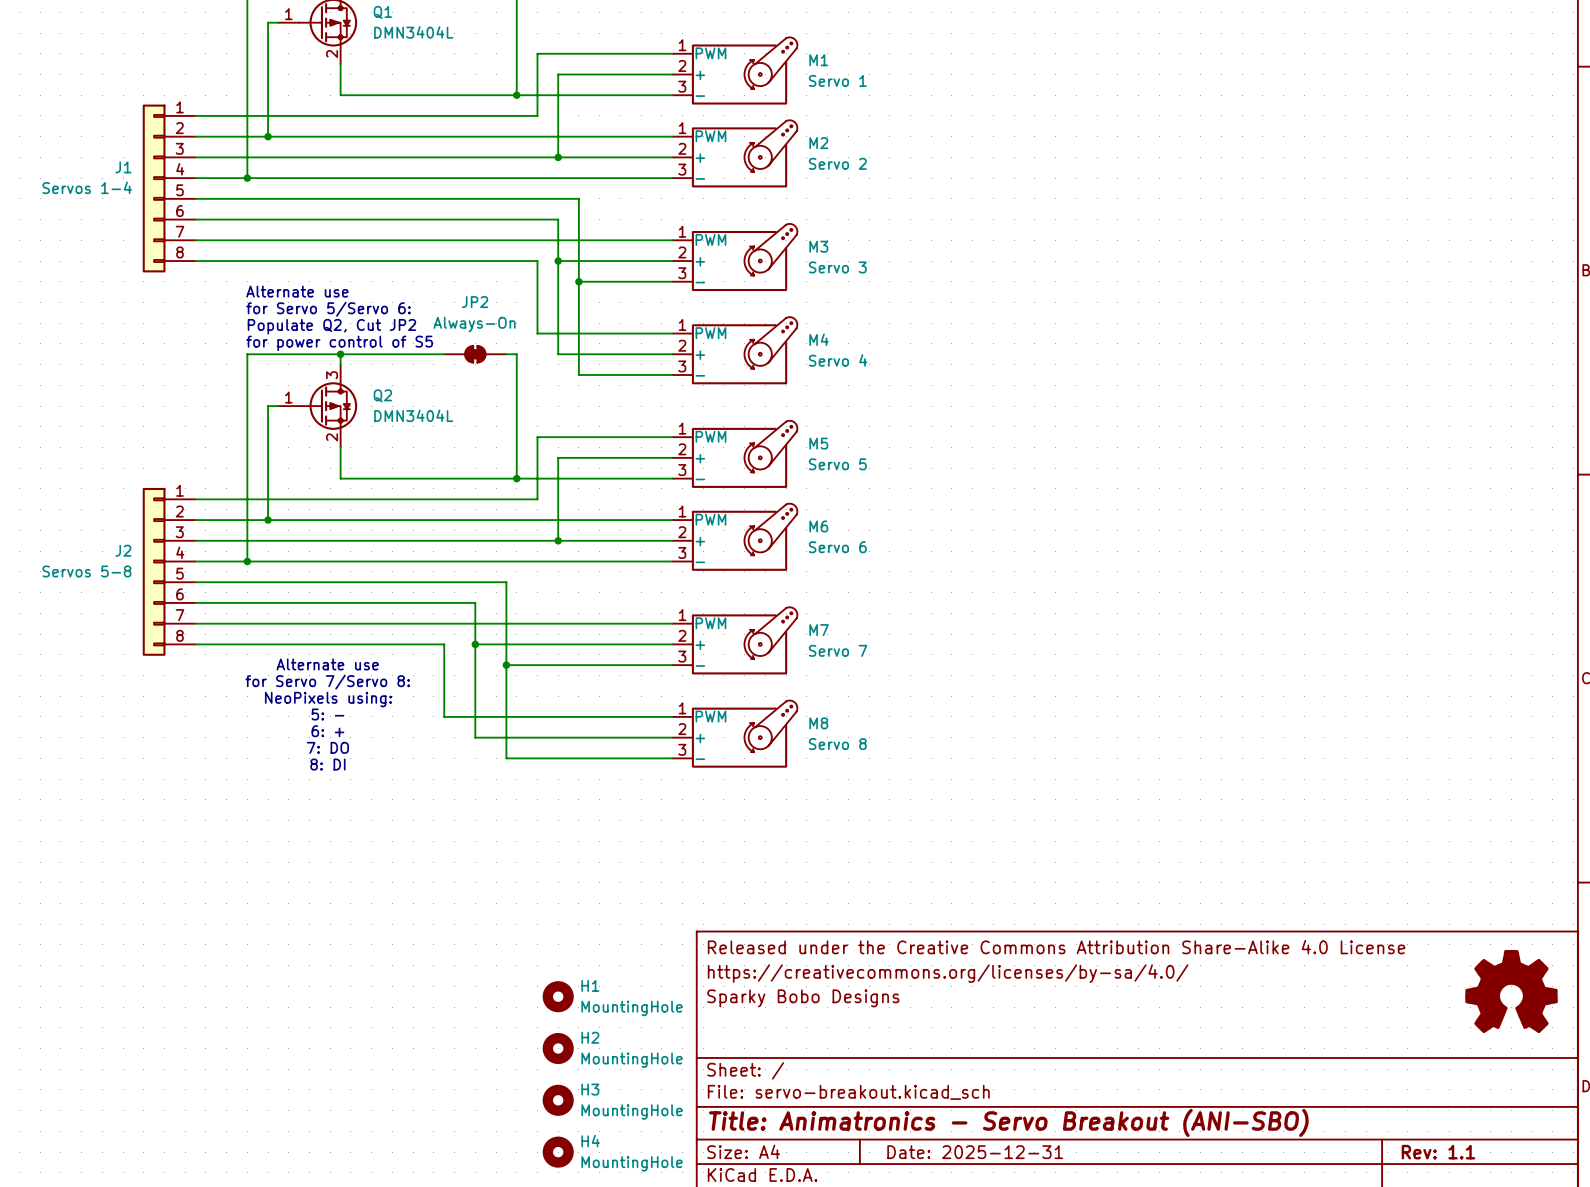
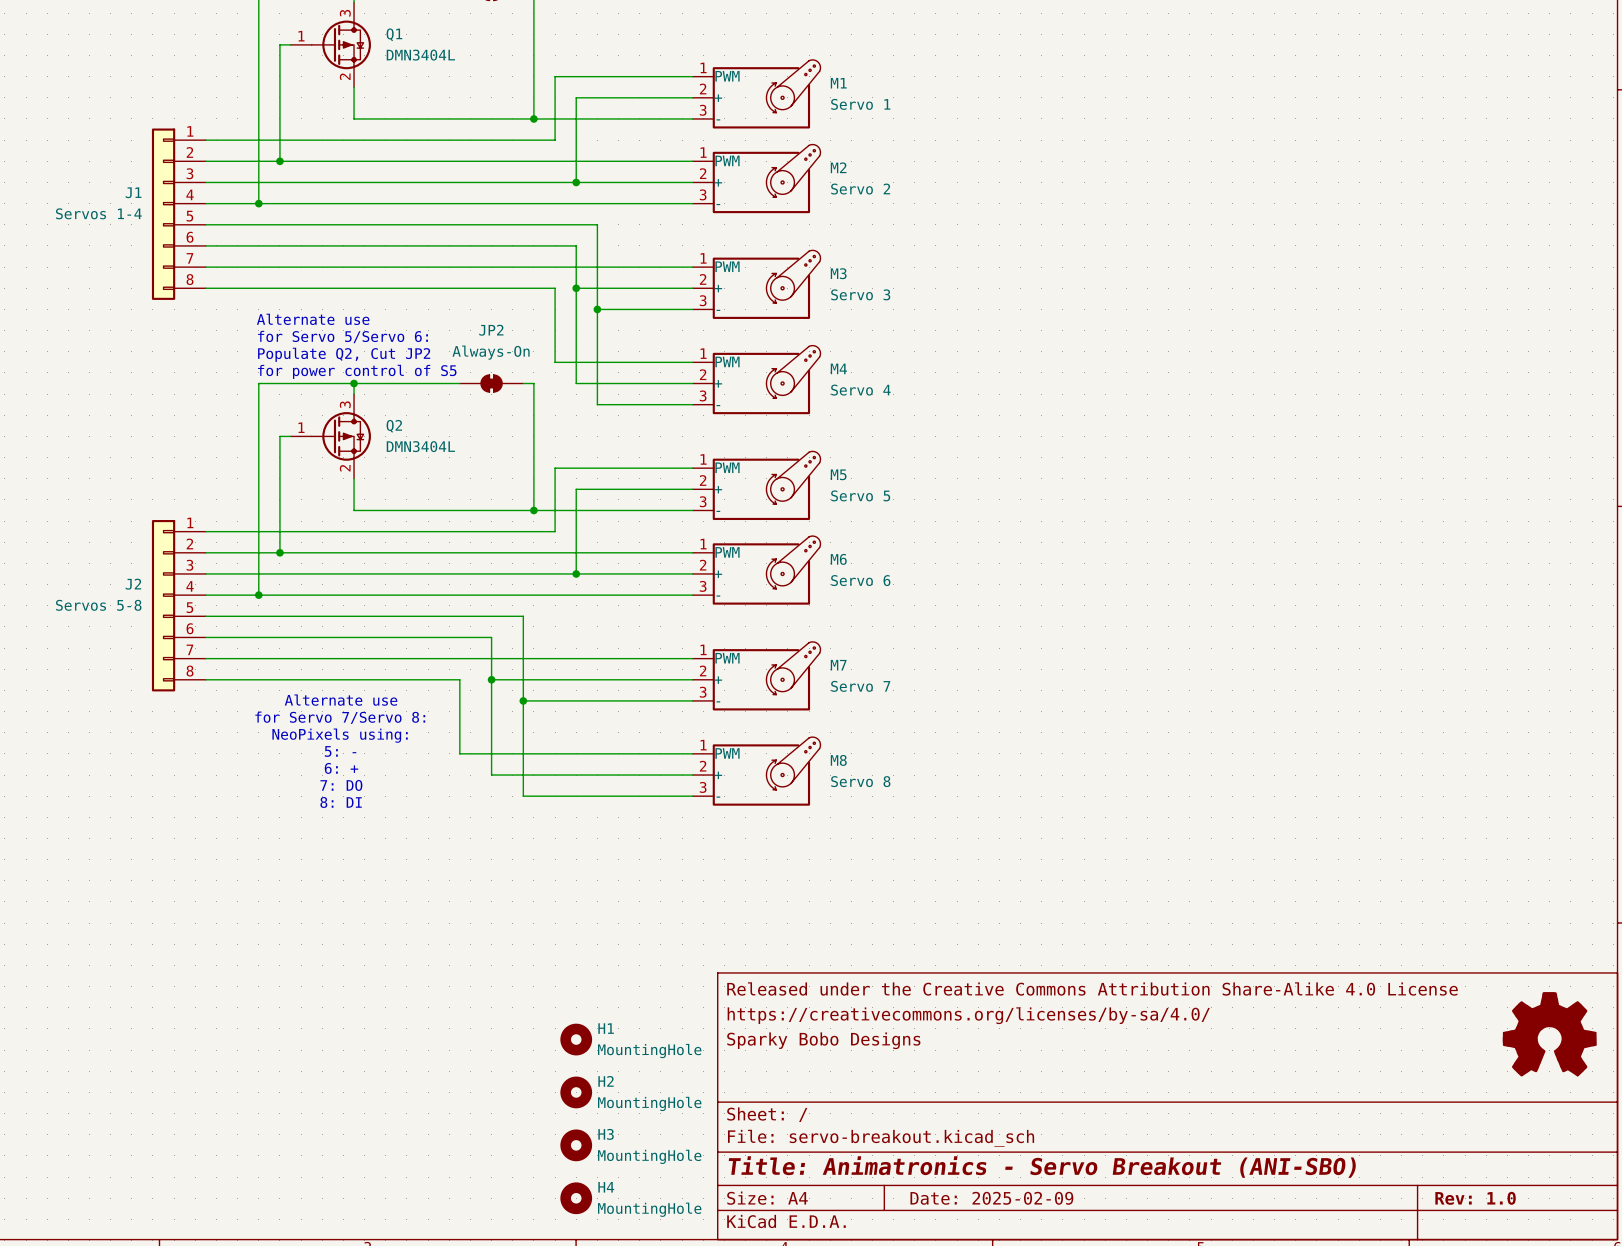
title block: Date: 2025-12-31 (975, 1152) -> Date: 2025-02-09 (991, 1198)
title block: Rev: 1.1 (1438, 1152) -> Rev: 1.0 (1475, 1198)

